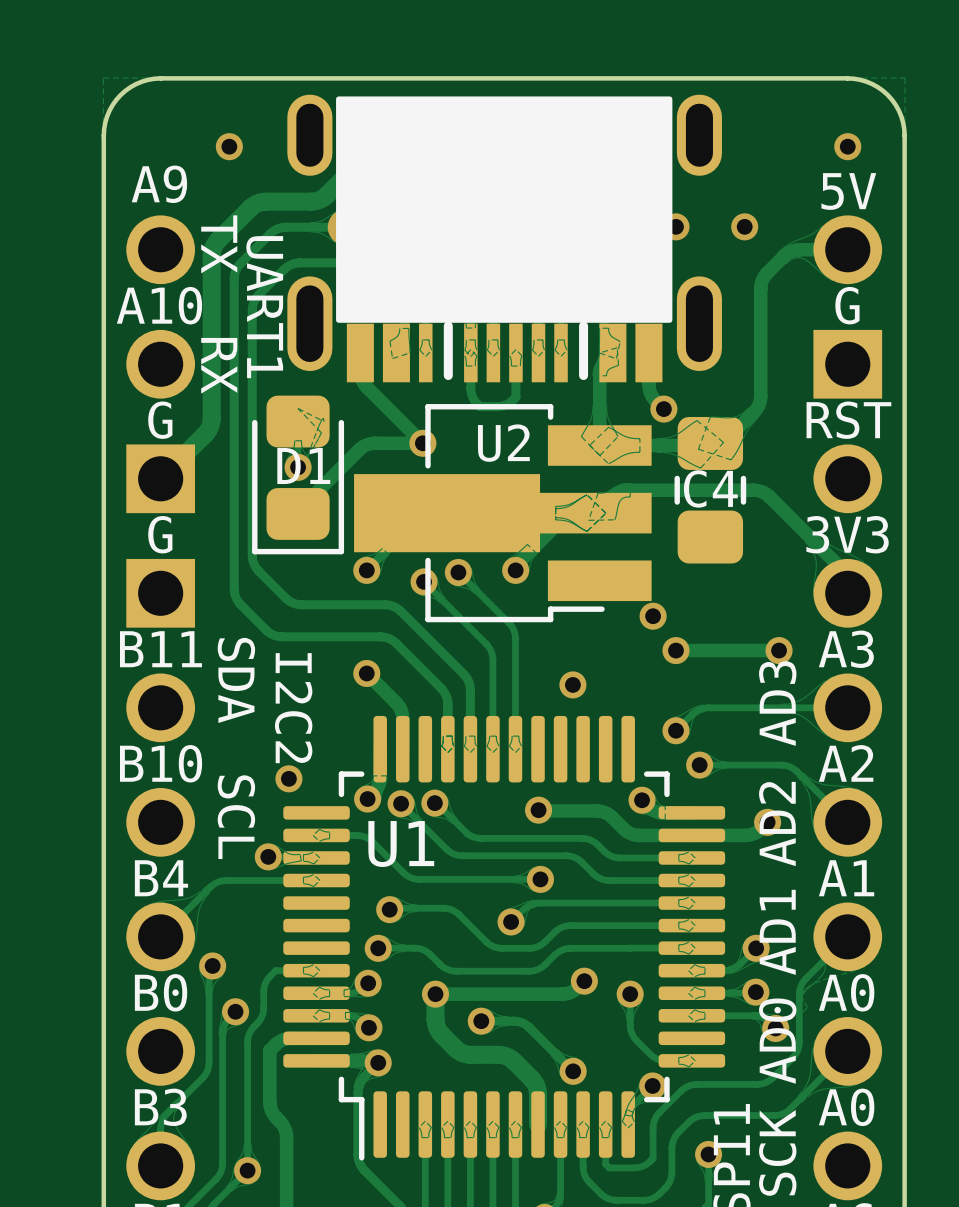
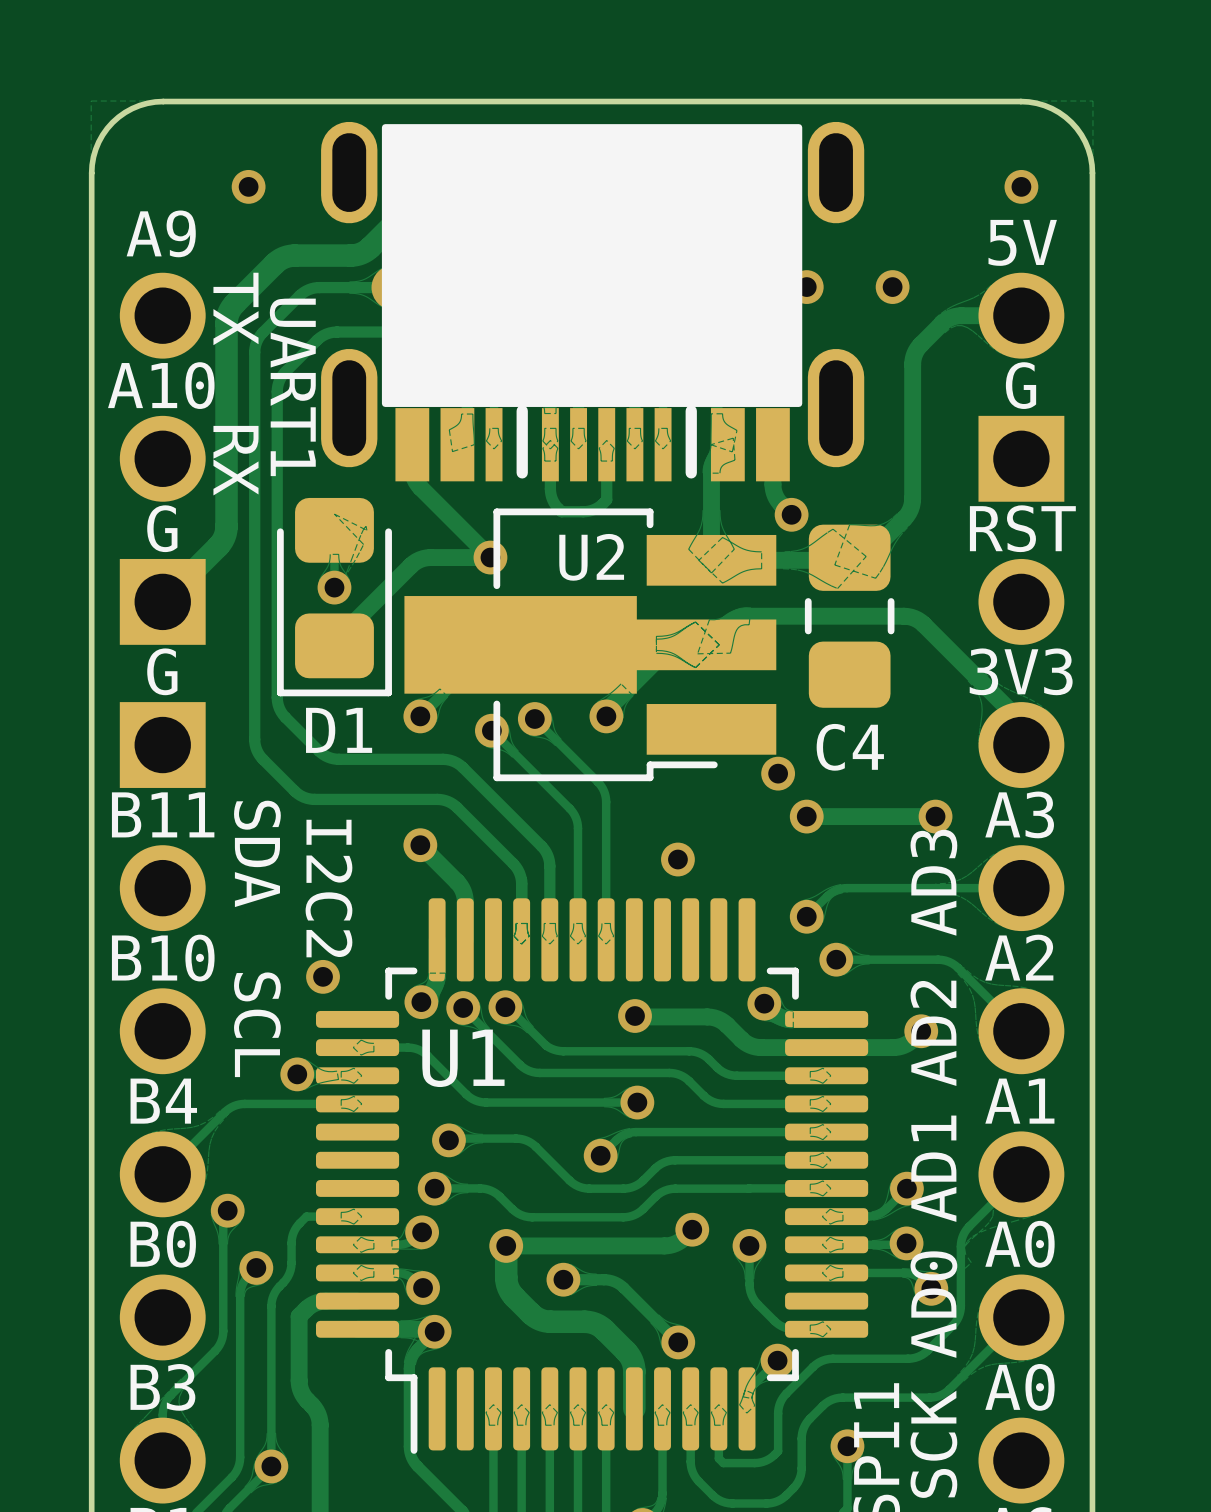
D1 name position: D1 (303, 465) -> D1 (339, 730)
C4 name position: C4 (710, 488) -> C4 (850, 747)

